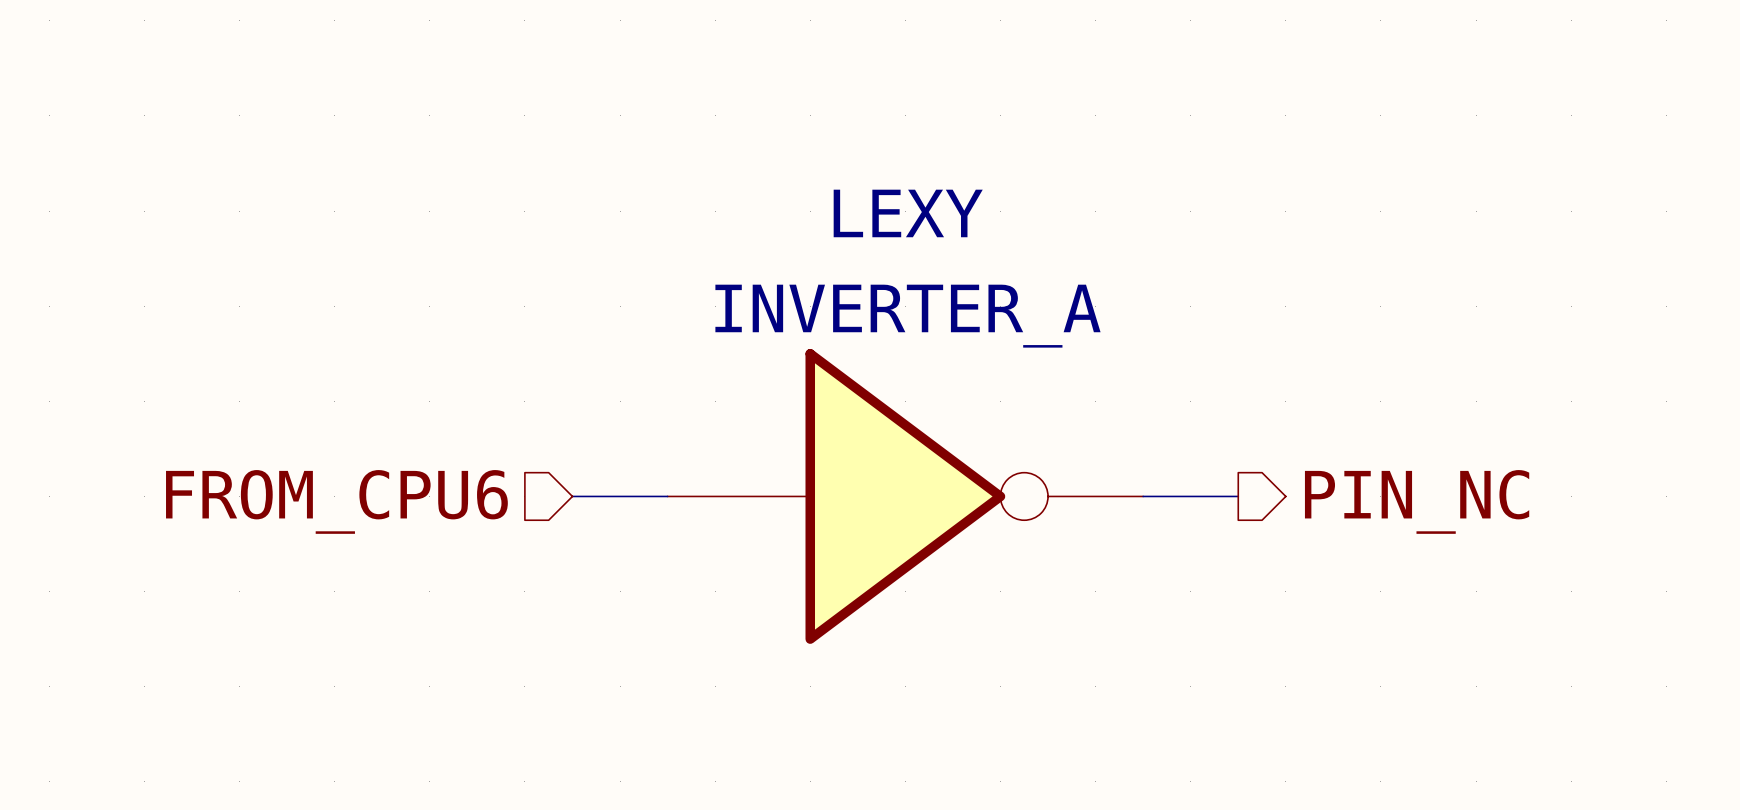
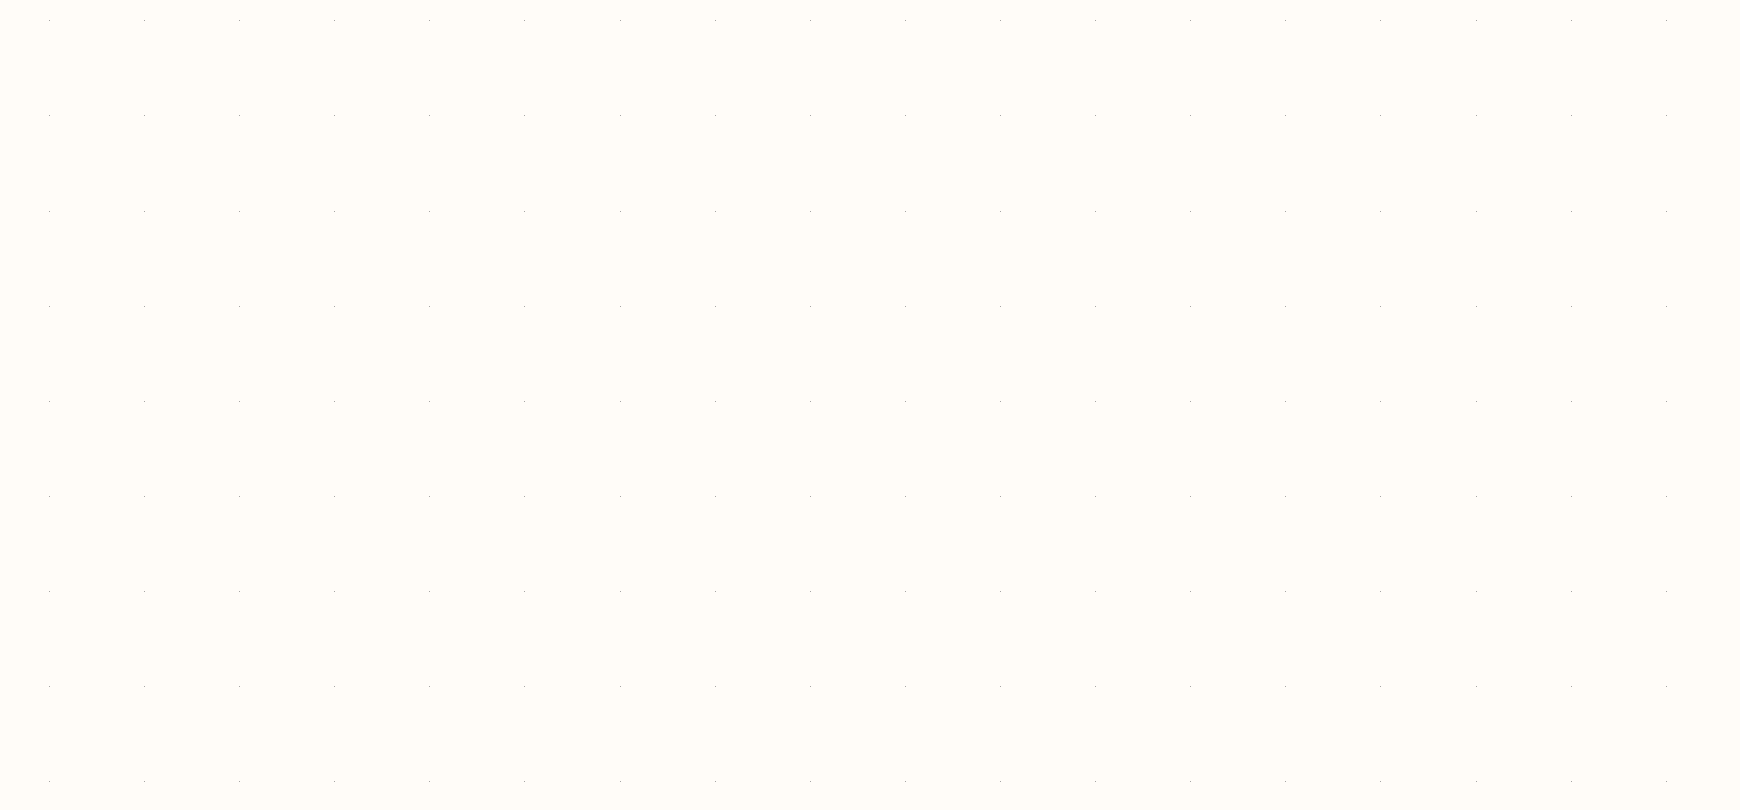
wire: (572, 496) (667, 496) -> none
LEXY: INVERTER_A (905, 496) -> none
wire: (1143, 496) (1238, 496) -> none
hierarchical label: FROM_CPU6 (336, 501) -> none
hierarchical label: PIN_NC (1417, 501) -> none

